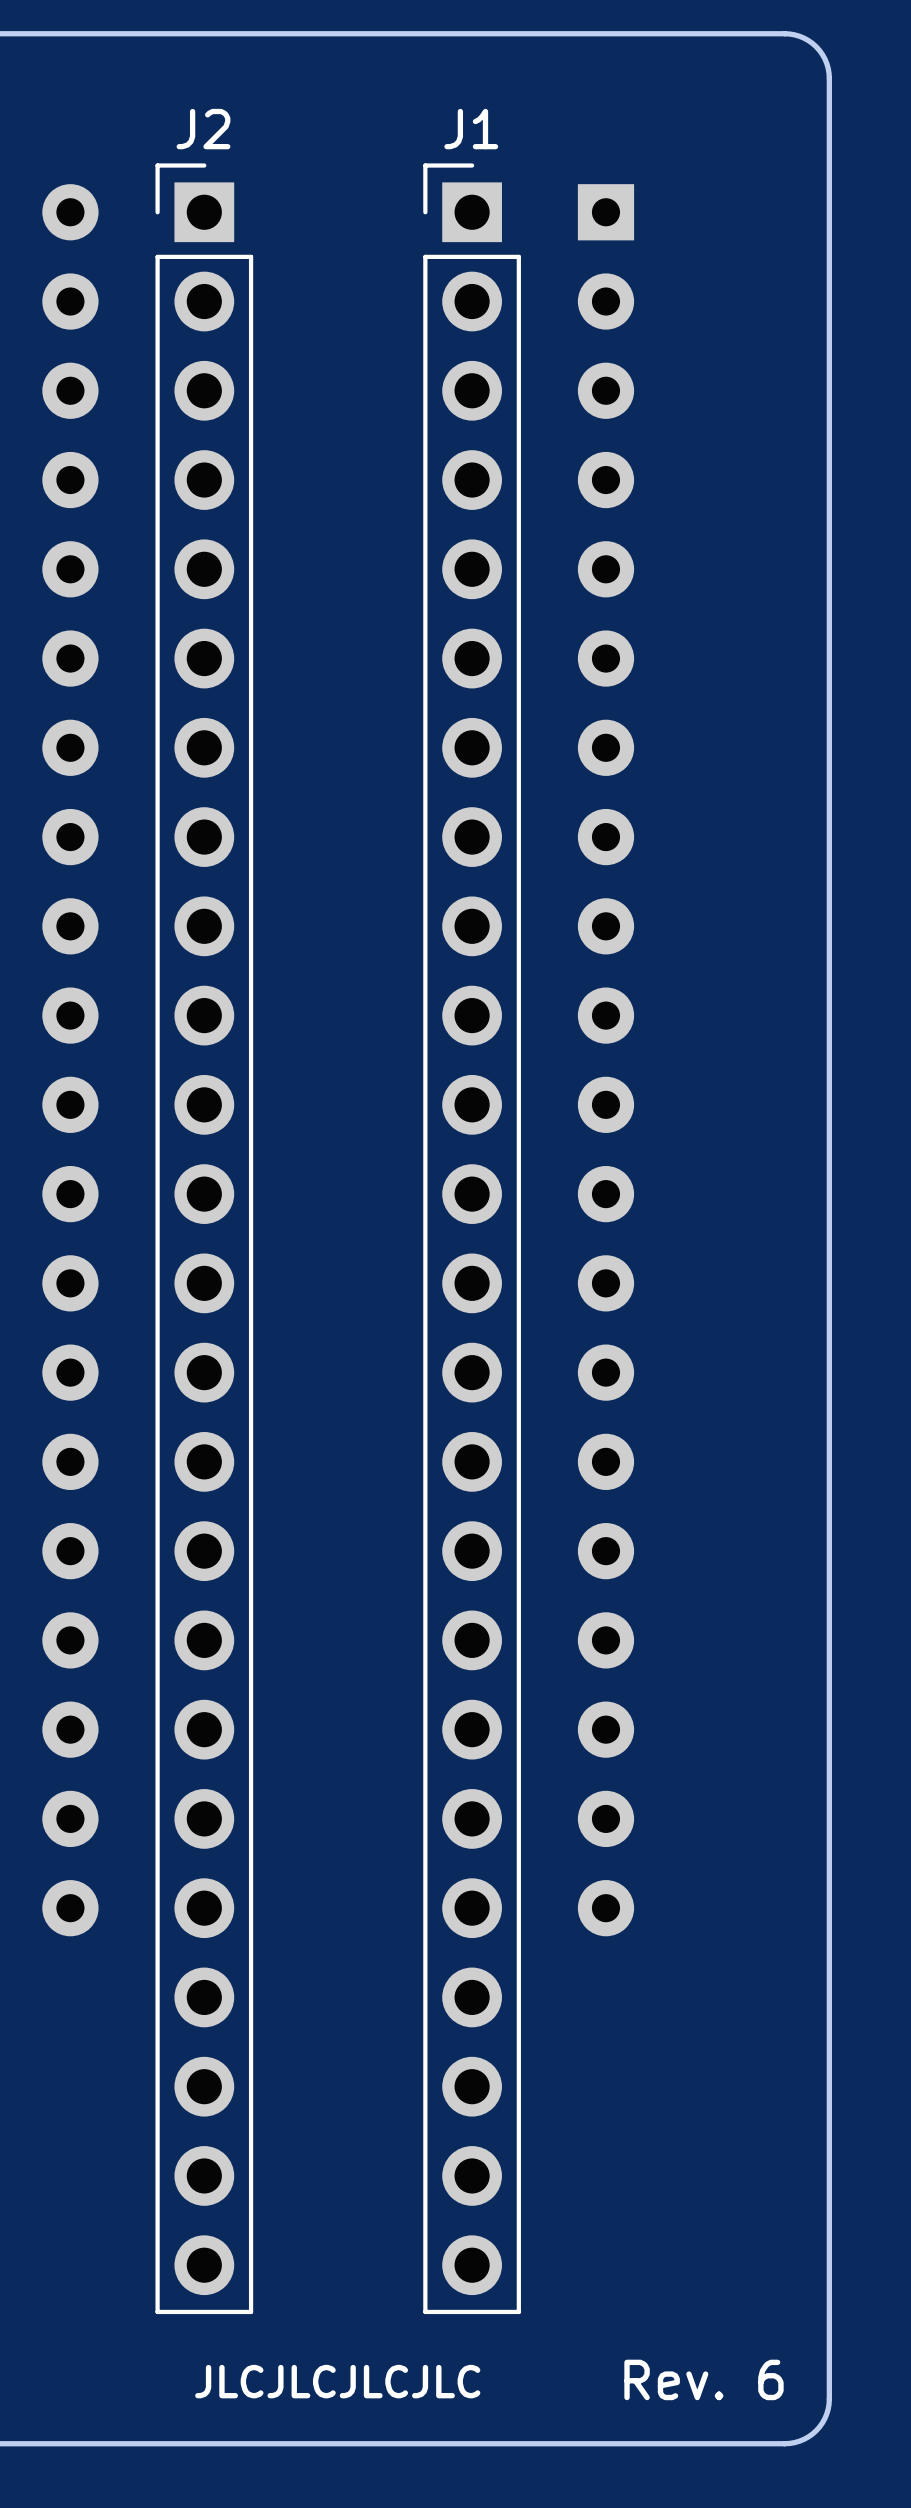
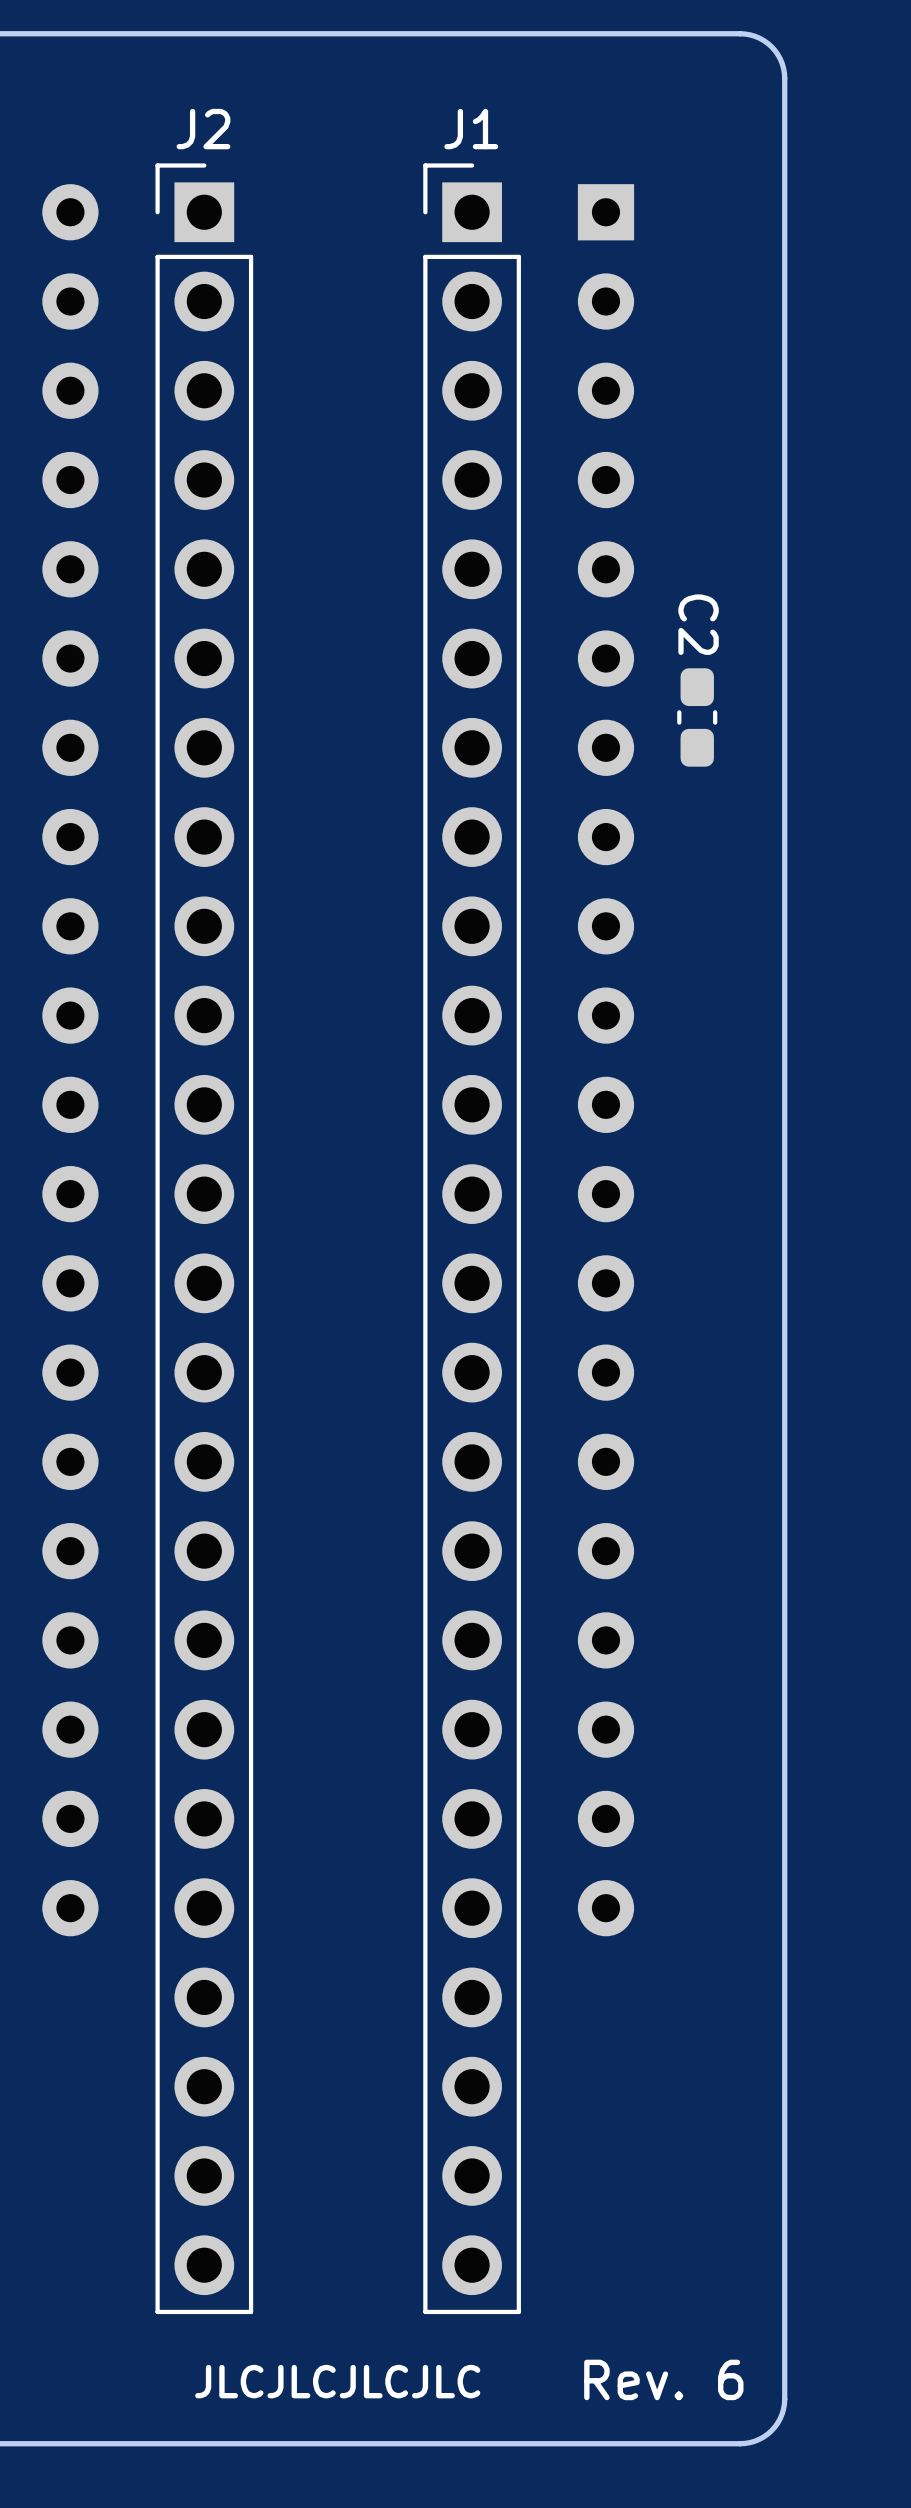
board edge: (740, 33) (789, 34) (804, 38) (816, 46) (822, 54) (826, 63) (829, 78) (829, 2399) (828, 2409) (822, 2422) (816, 2430) (804, 2439) (789, 2443) (740, 2443) -> (740, 33) (754, 36) (771, 46) (782, 63) (784, 78) (784, 2399) (782, 2413) (771, 2430) (754, 2441) (740, 2443)
C2: none -> (697, 717)
text position: Rev. 6 (703, 2379) -> Rev. 6 (663, 2379)

